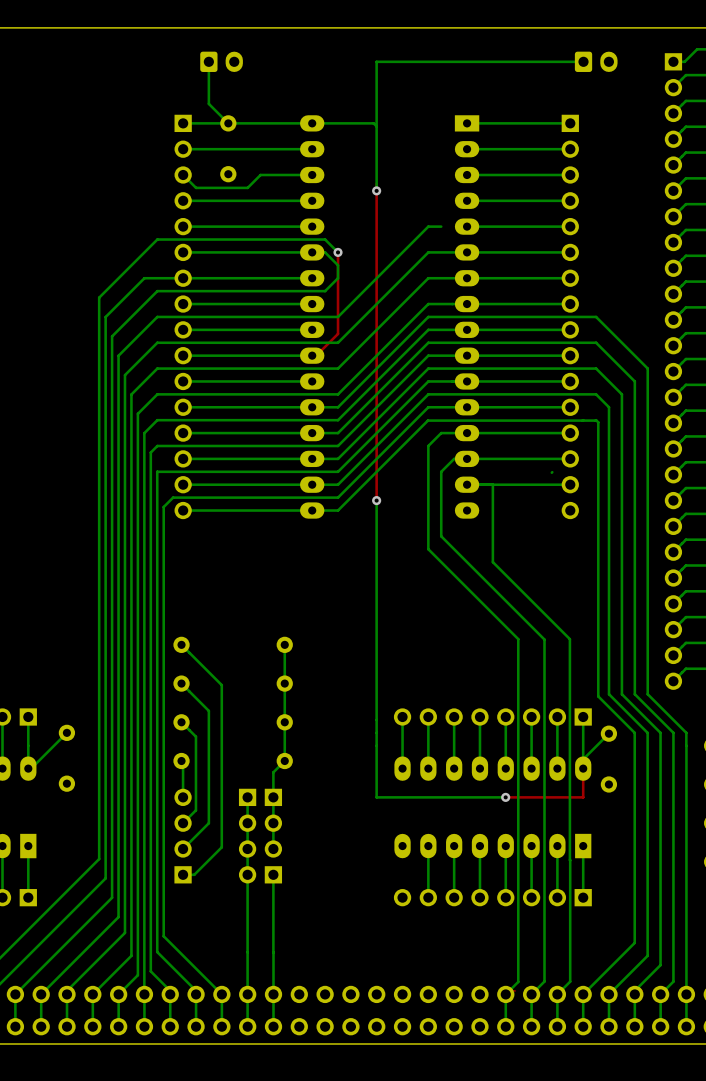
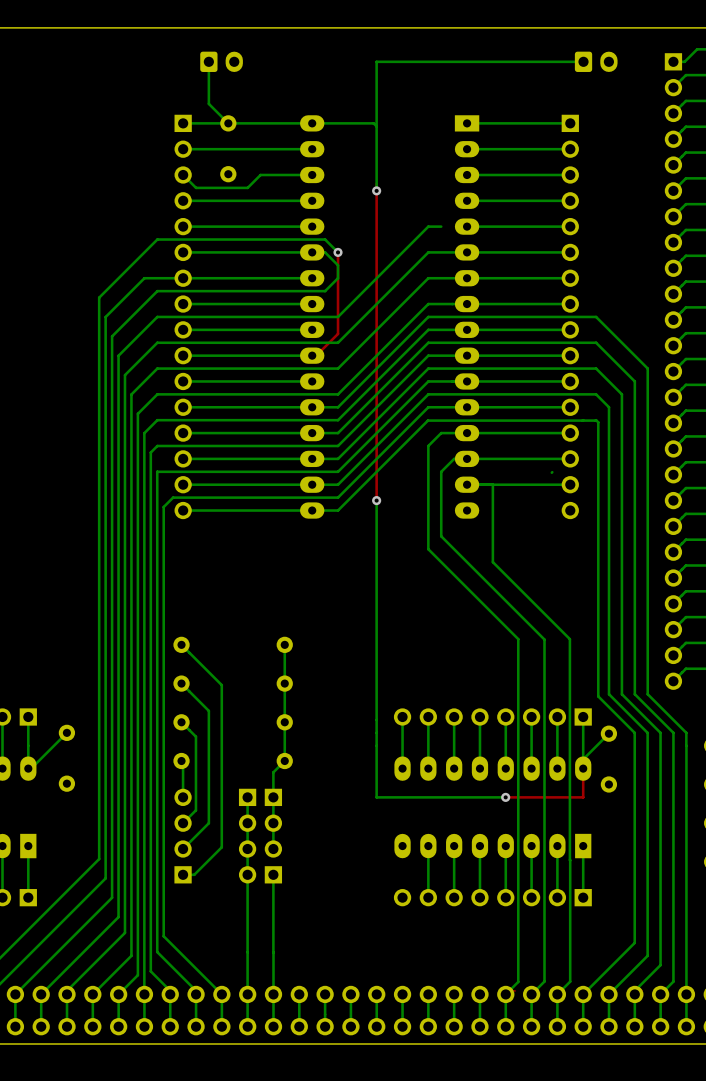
bottom track: none -> (299, 994) (299, 1026)
bottom track: none -> (325, 994) (325, 1026)
bottom track: none -> (350, 994) (350, 1026)
bottom track: none -> (376, 994) (376, 1026)
bottom track: none -> (402, 994) (402, 1026)
bottom track: none -> (428, 994) (428, 1026)
bottom track: none -> (454, 994) (454, 1026)
bottom track: none -> (479, 994) (479, 1026)

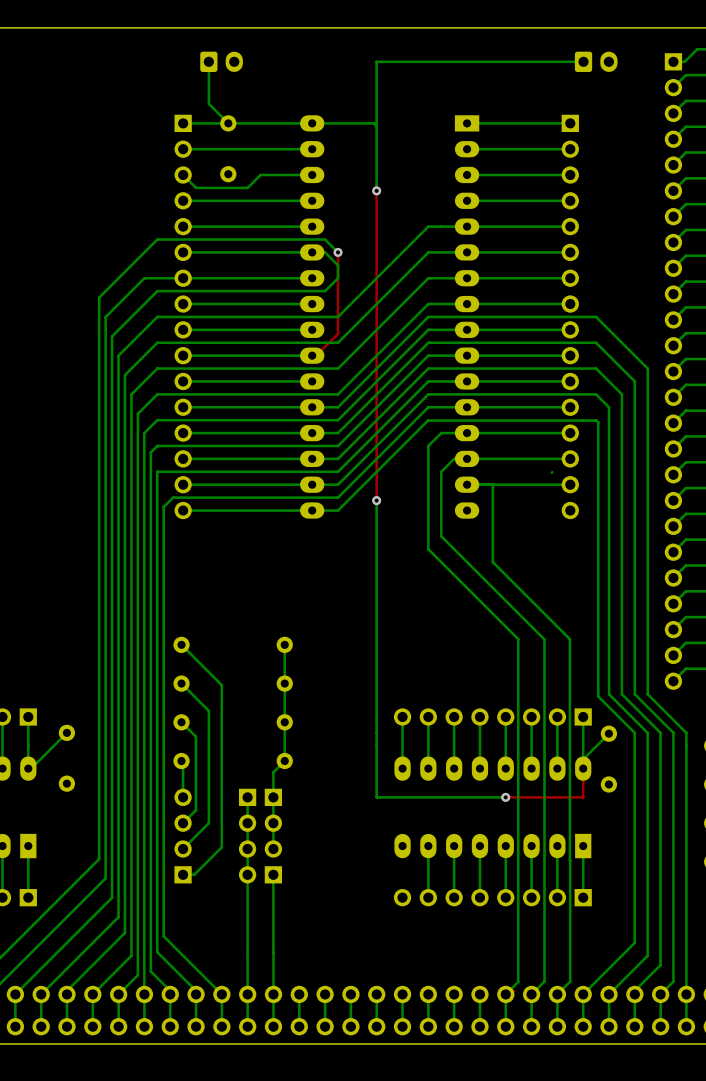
bottom track: none -> (467, 226) (441, 226)

